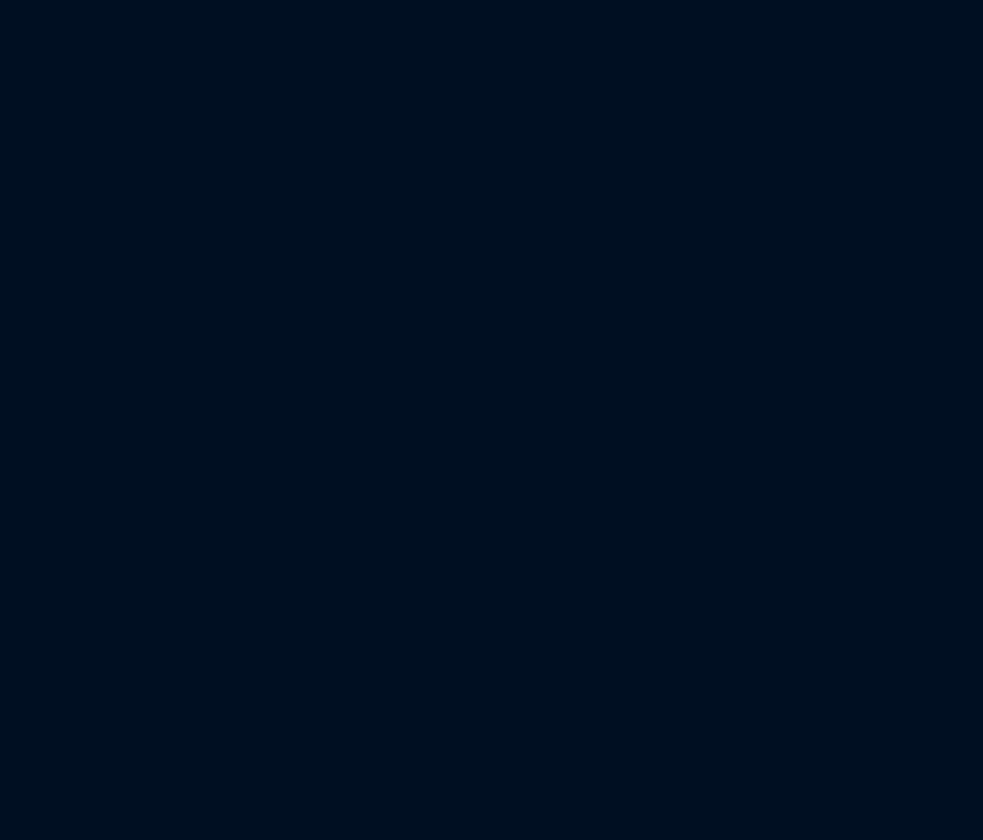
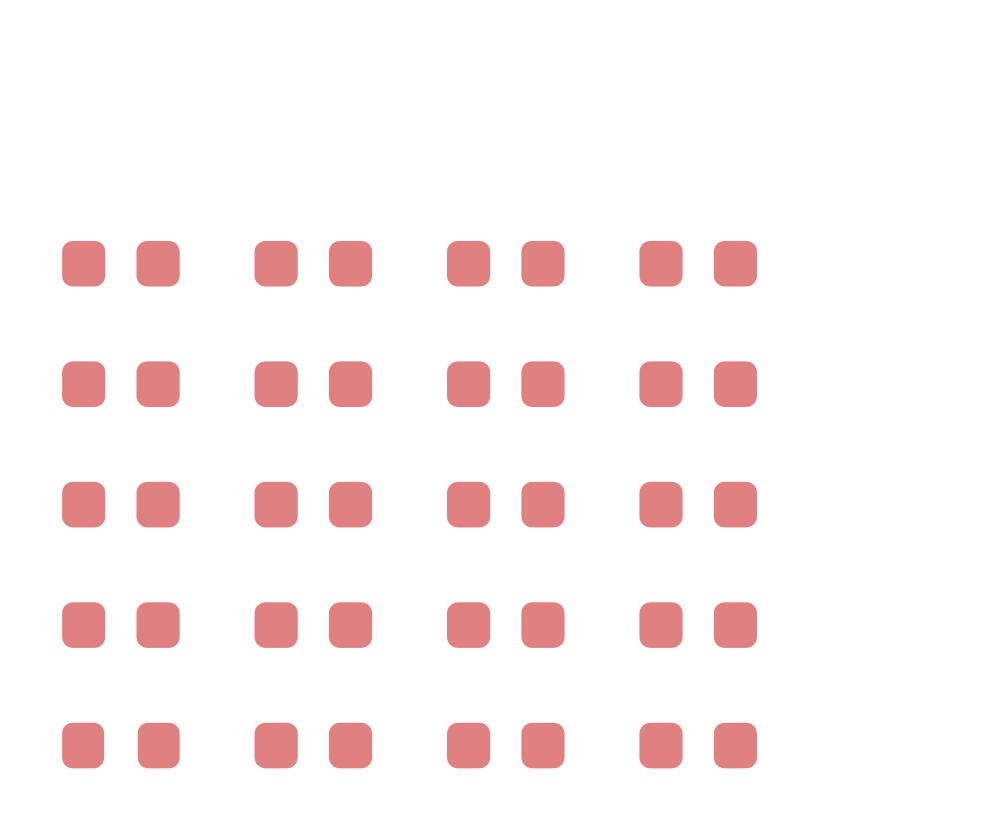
part: none -> (120, 263)
part: none -> (313, 263)
part: none -> (505, 263)
part: none -> (698, 263)
part: none -> (120, 384)
part: none -> (313, 384)
part: none -> (505, 384)
part: none -> (698, 384)
part: none -> (120, 504)
part: none -> (313, 504)
part: none -> (505, 504)
part: none -> (698, 504)
part: none -> (120, 625)
part: none -> (313, 625)
part: none -> (505, 625)
part: none -> (698, 625)
part: none -> (120, 745)
part: none -> (313, 745)
part: none -> (505, 745)
part: none -> (698, 745)

